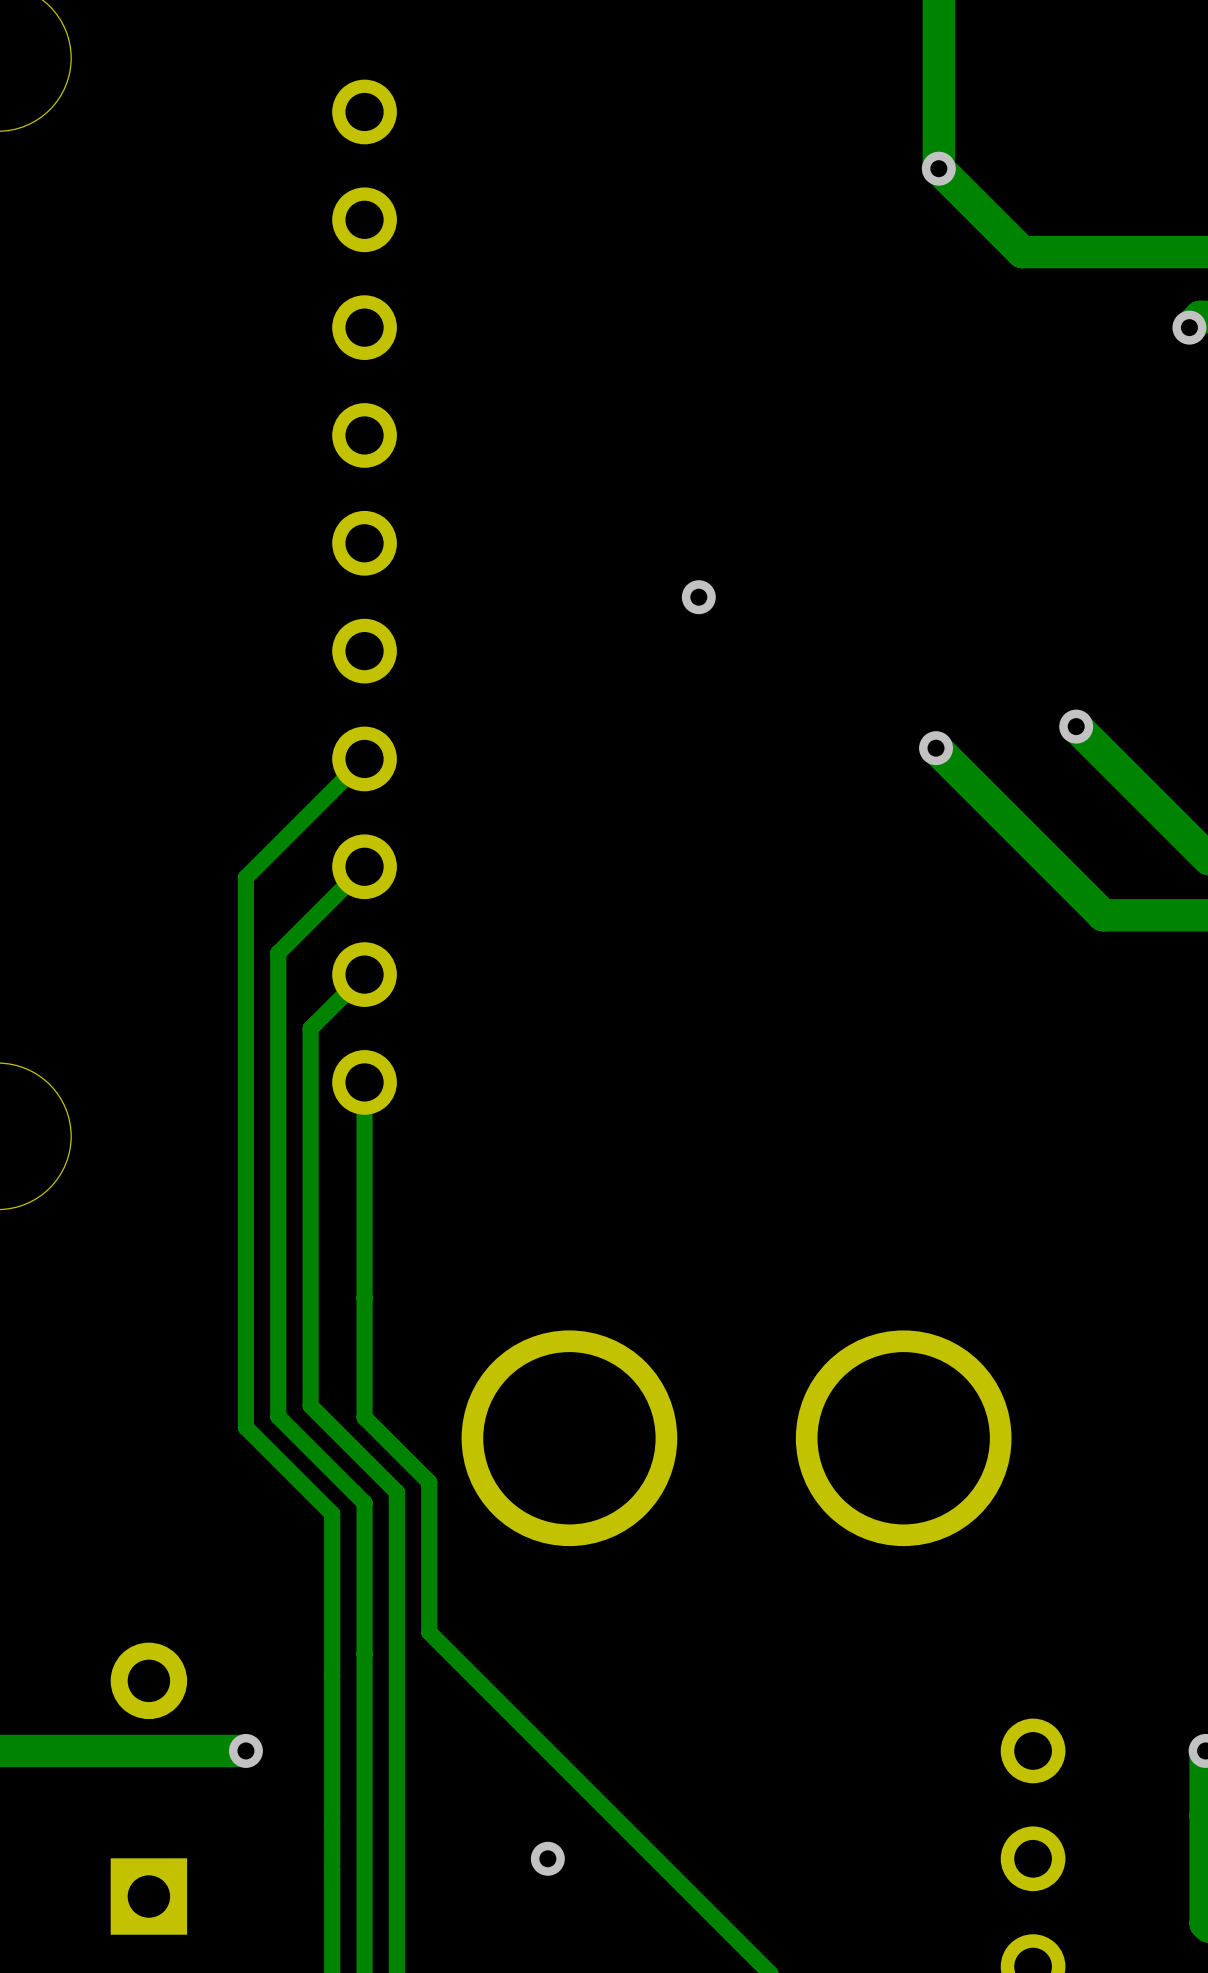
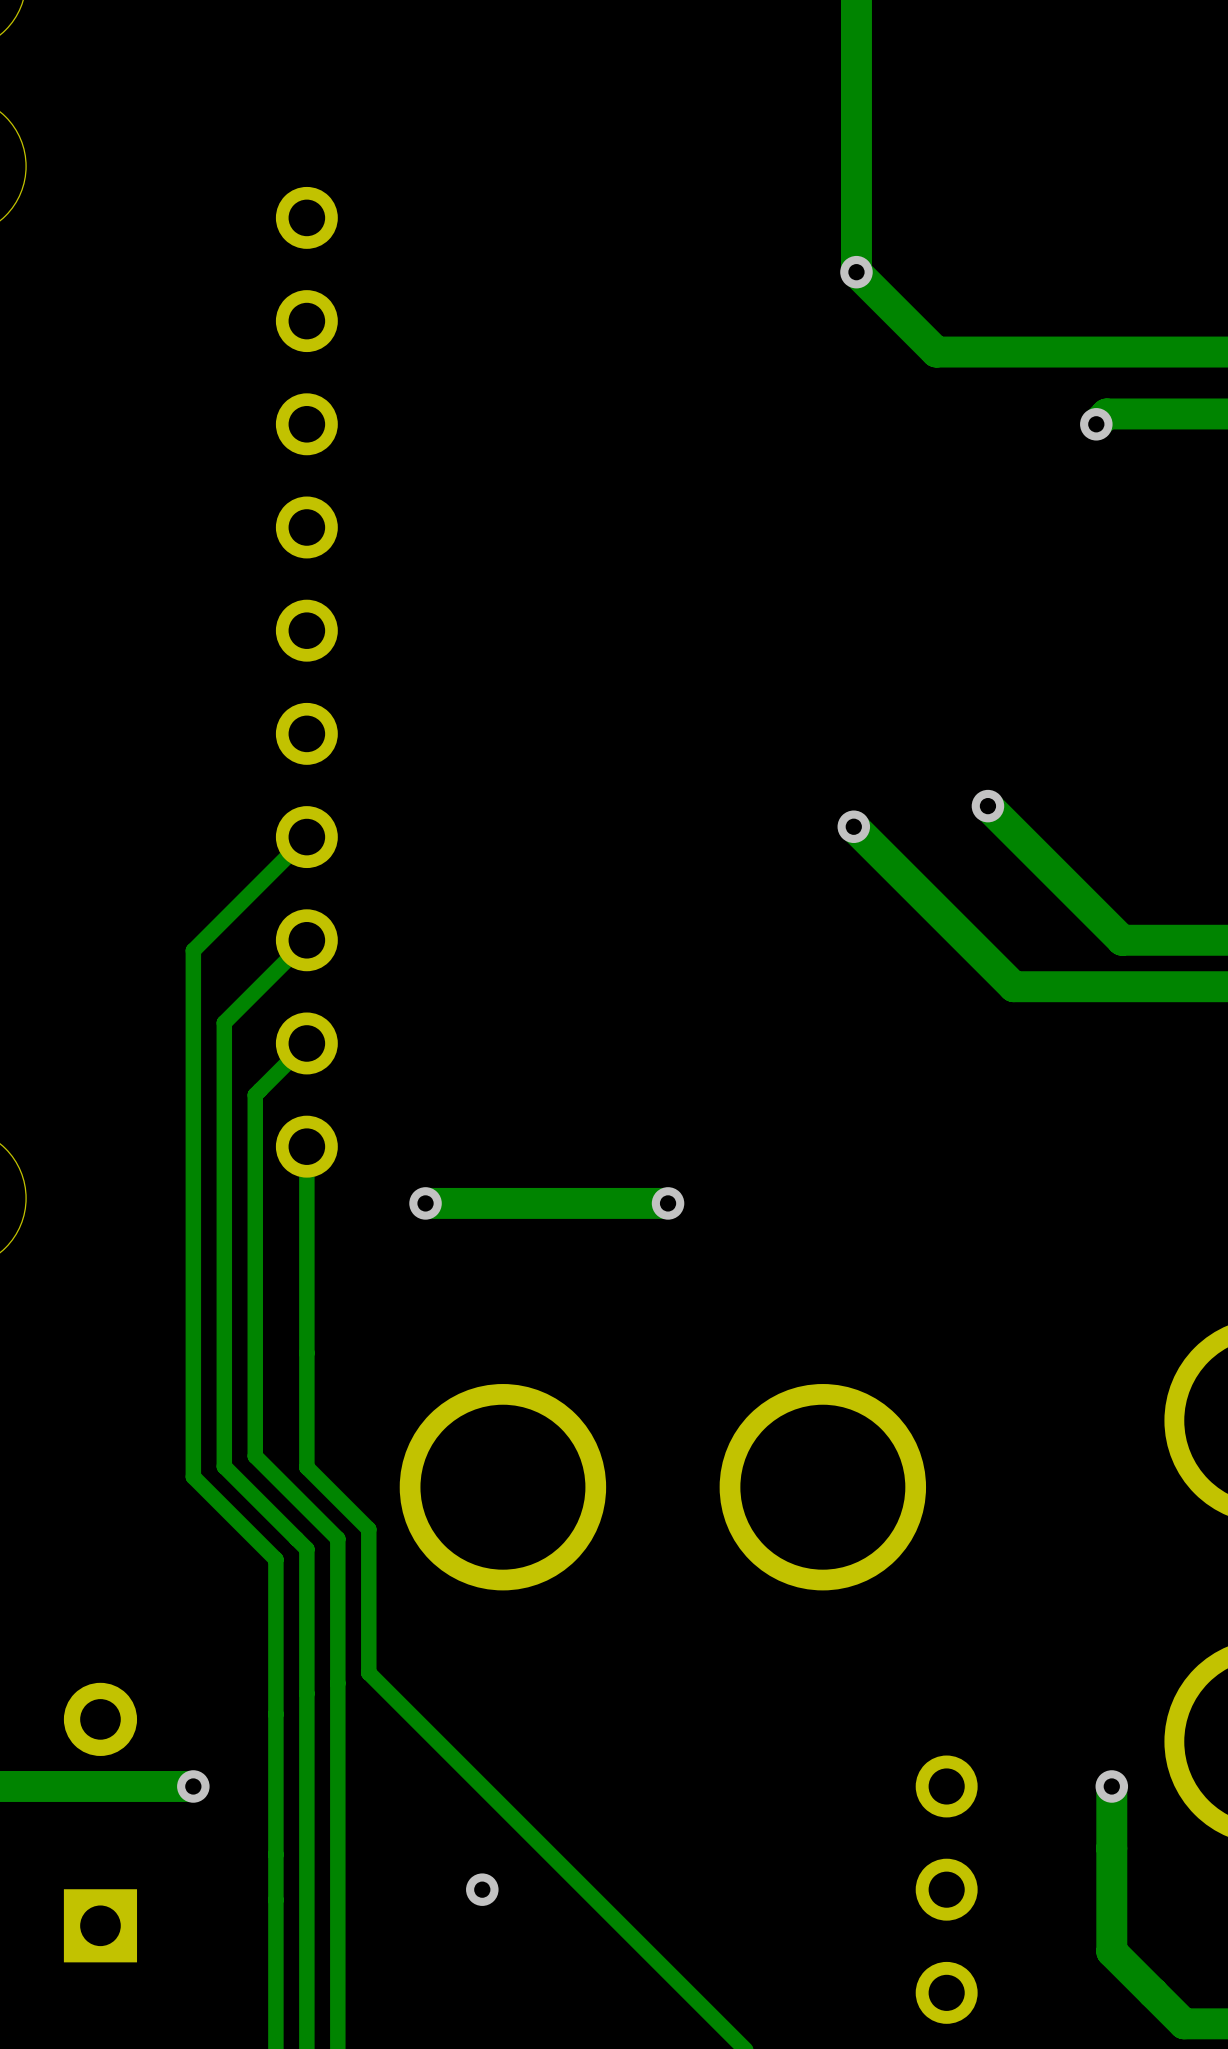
via: (698, 597) -> none
via: none -> (425, 1203)
track: none -> (668, 1203) (425, 1203)
via: none -> (668, 1203)

